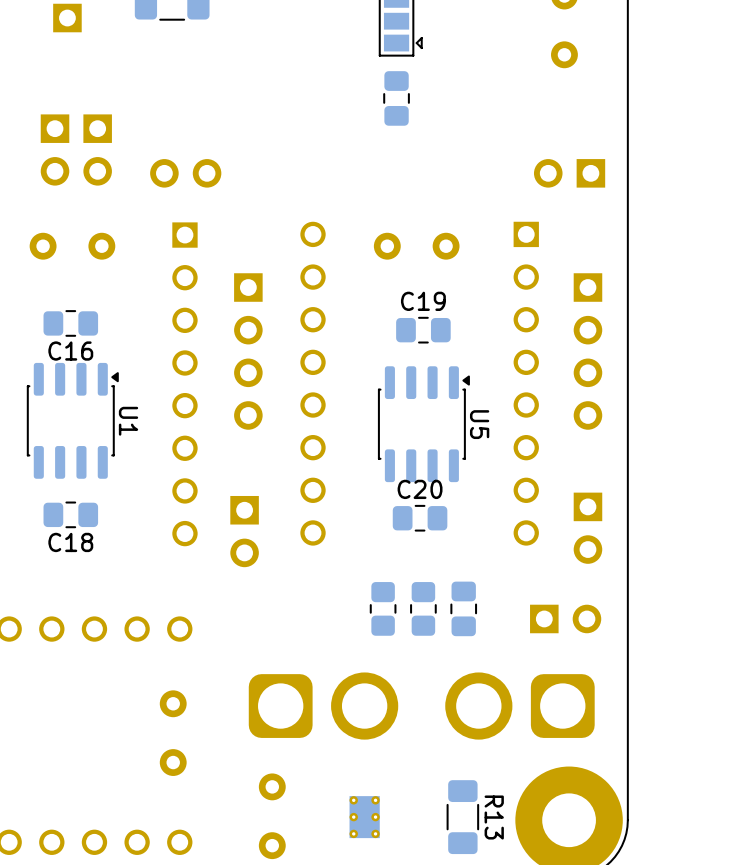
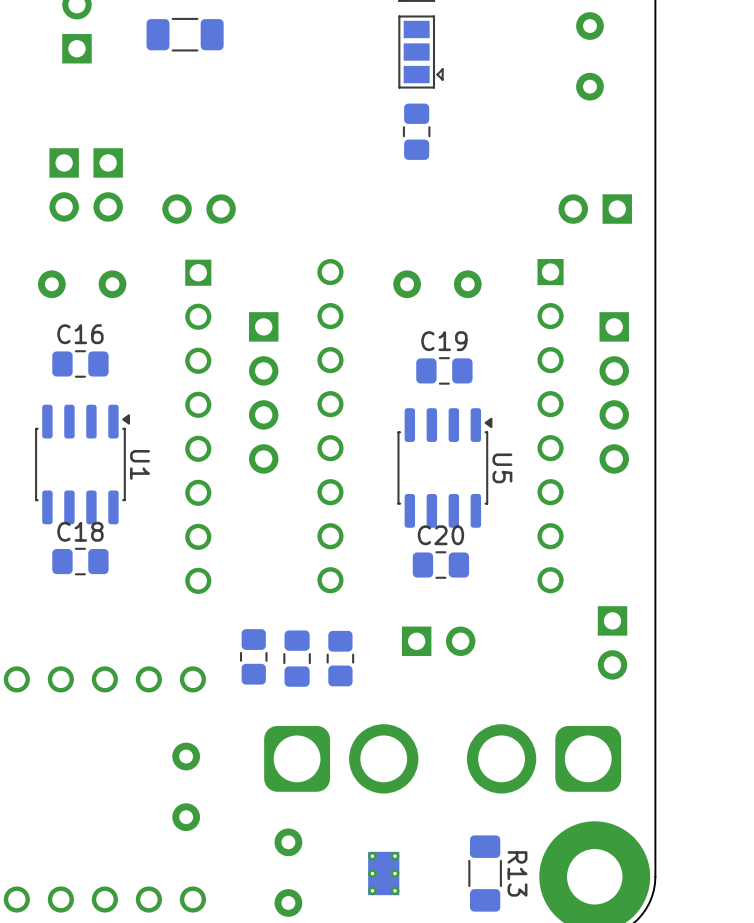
C16 name position: C16 (70, 351) -> C16 (80, 334)
part: (587, 528) -> none
part: (244, 531) -> none
C18 name position: C18 (70, 542) -> C18 (80, 531)
part: none -> (438, 641)
part: none -> (612, 642)
part: none -> (253, 656)
part: none -> (340, 658)
part: (383, 608) -> none
part: (423, 608) -> none
part position: (463, 608) -> (297, 658)
part: (565, 618) -> none

